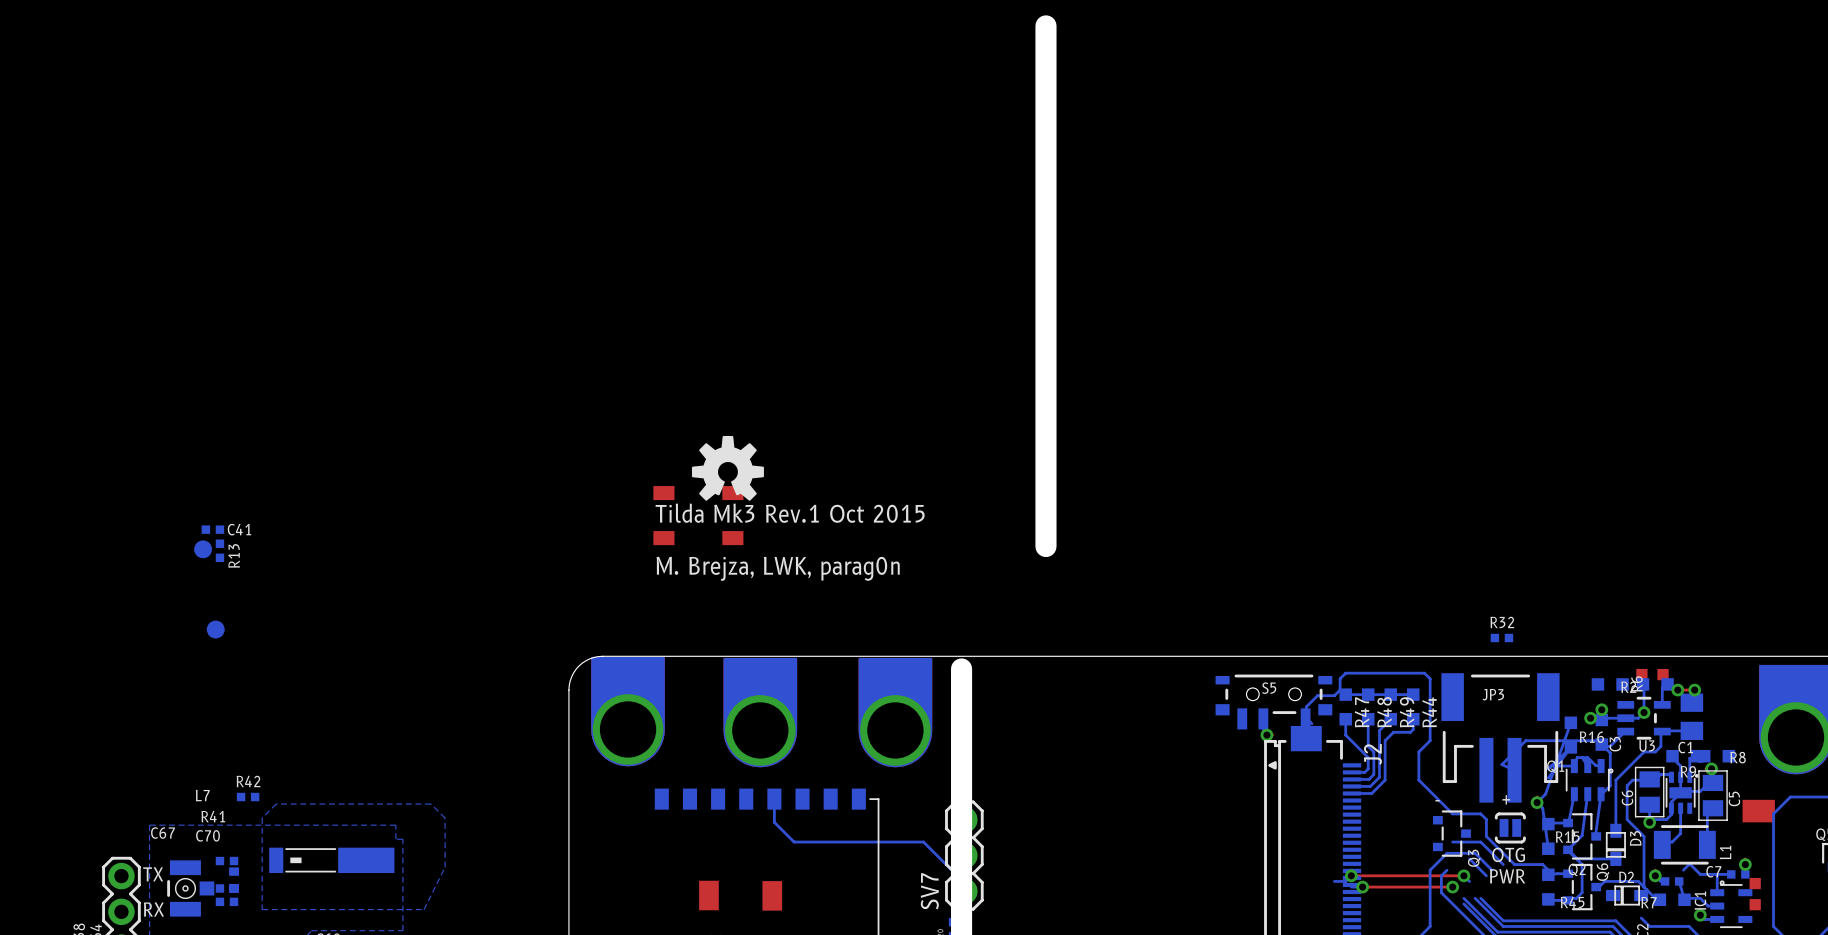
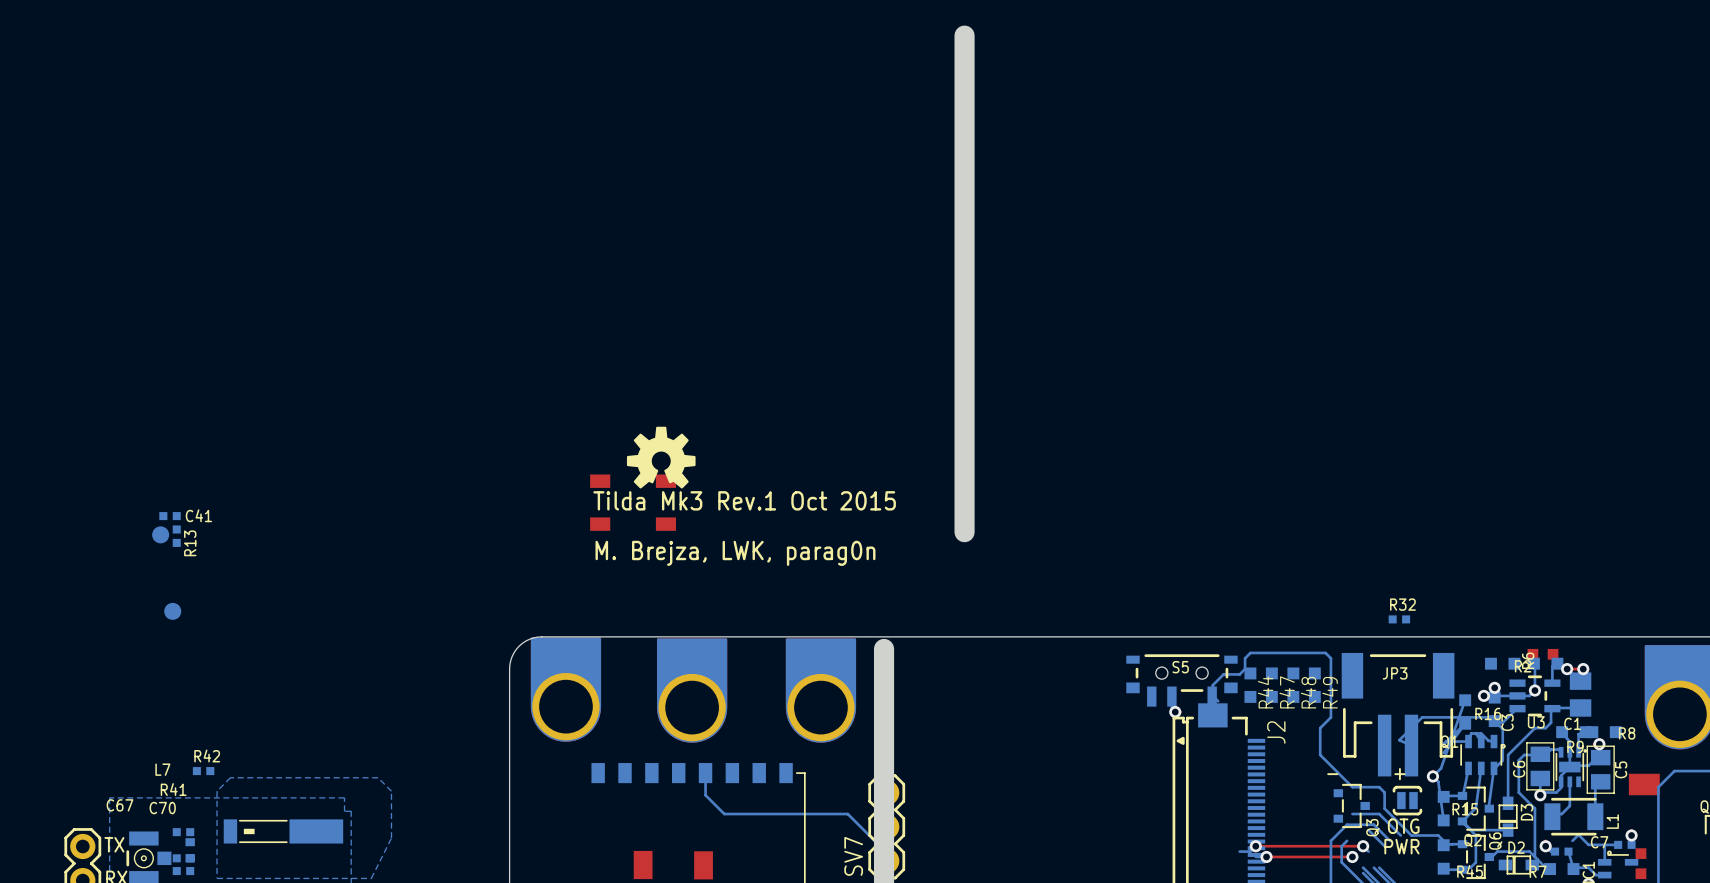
bottom track: (1413, 694) (1345, 694) -> none
R47 name: R47 (1362, 712) -> R44 (1265, 692)
R48 name: R48 (1384, 712) -> R47 (1287, 692)
R49 name: R49 (1407, 712) -> R48 (1308, 692)
R44 name: R44 (1429, 712) -> R49 (1330, 692)
bottom track: (1345, 719) (1345, 735) (1368, 757) (1368, 768) (1364, 772) (1352, 772) -> none
bottom track: (1368, 719) (1368, 746) (1373, 751) (1373, 774) (1368, 779) (1352, 779) -> none
bottom track: (1390, 719) (1379, 730) (1379, 777) (1370, 786) (1352, 786) -> none
bottom track: (1413, 719) (1413, 729) (1410, 732) (1393, 732) (1385, 740) (1385, 780) (1371, 793) (1352, 793) -> none

